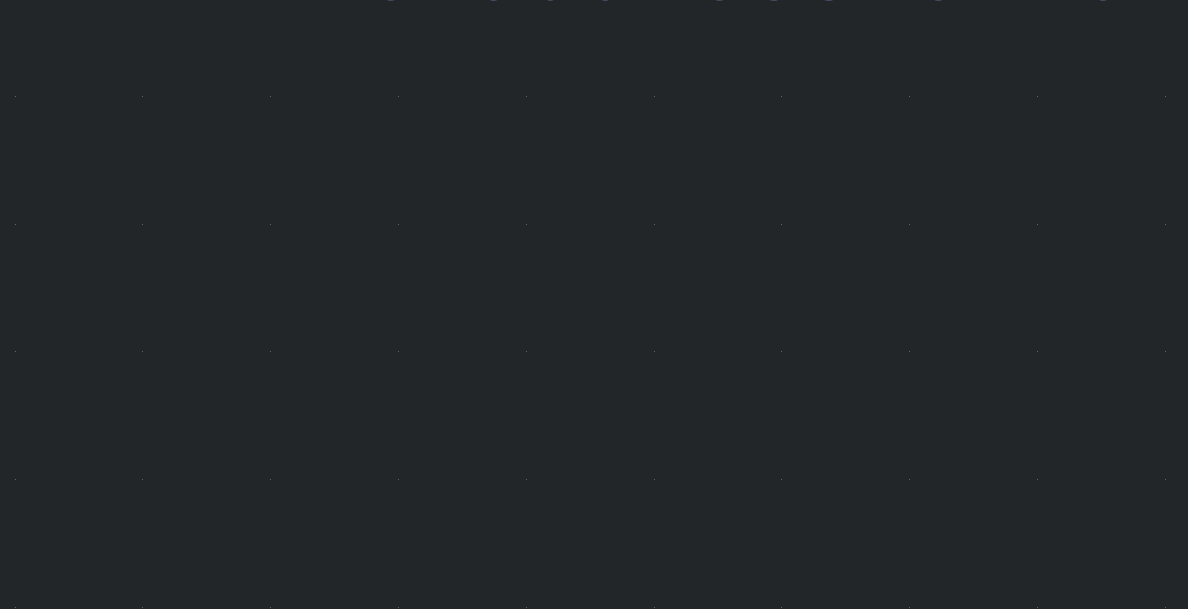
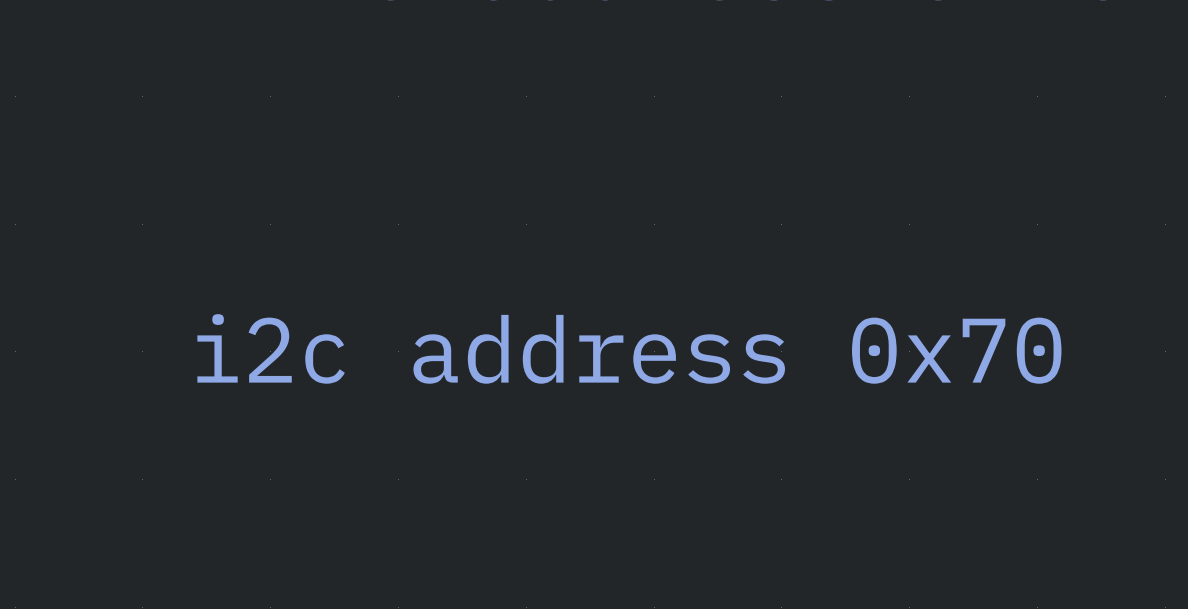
text: none -> i2c address 0x70 (629, 348)

